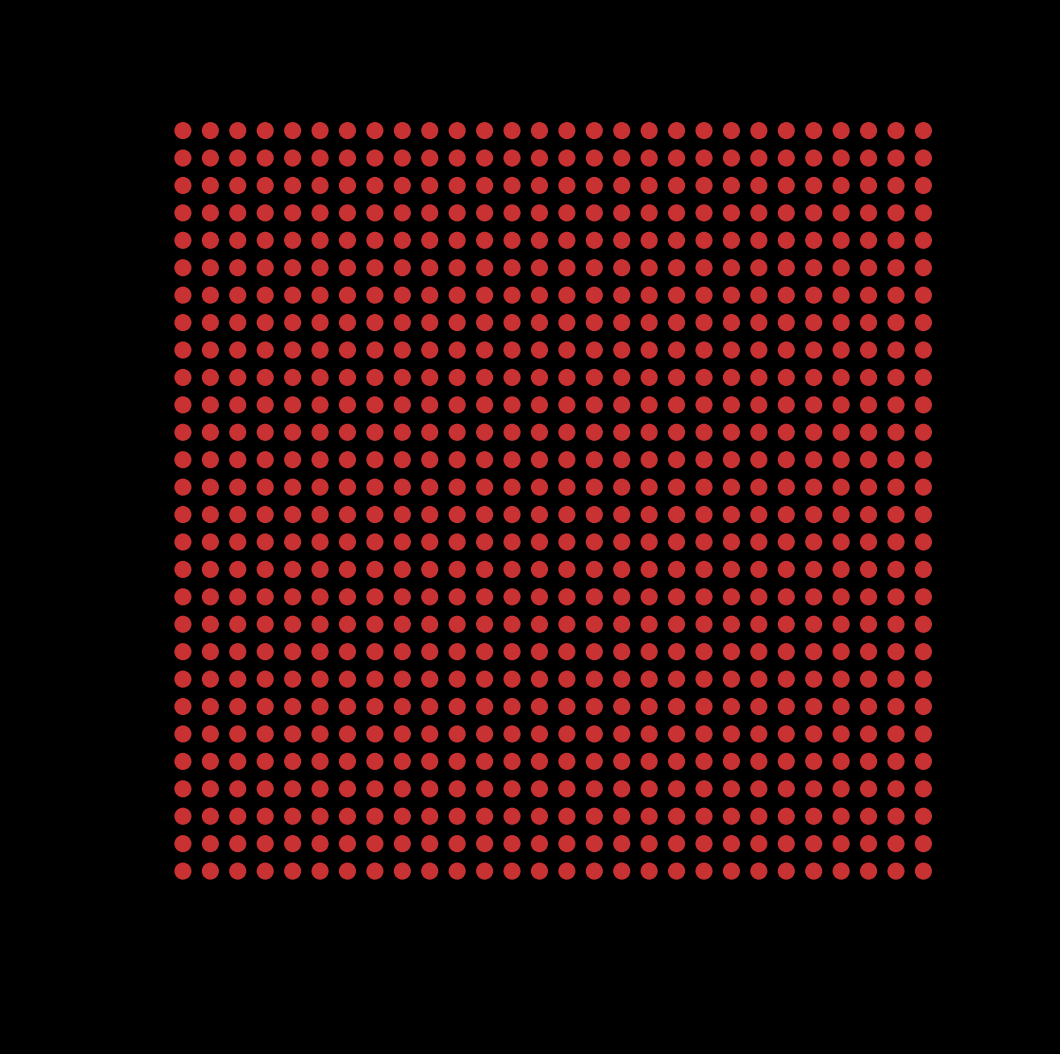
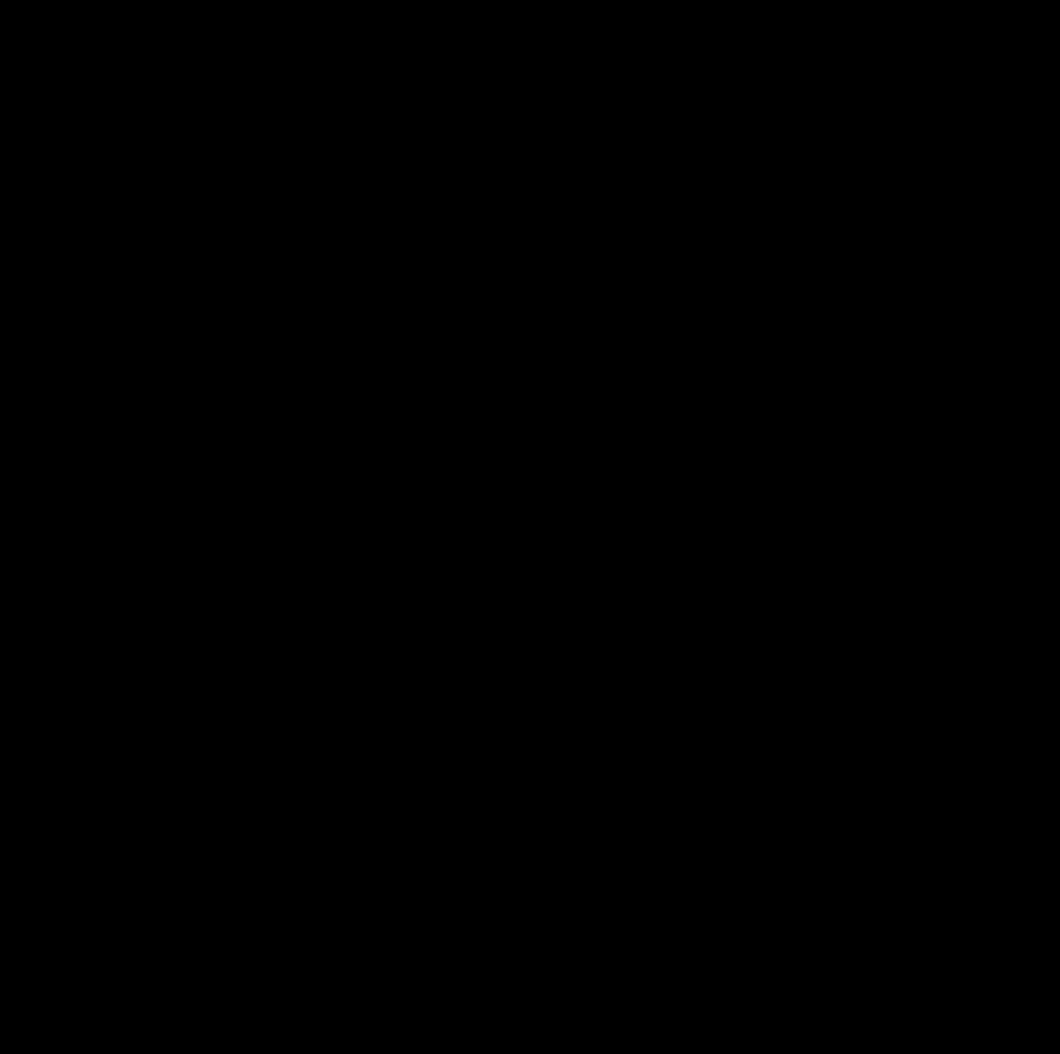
part: (553, 500) -> none

